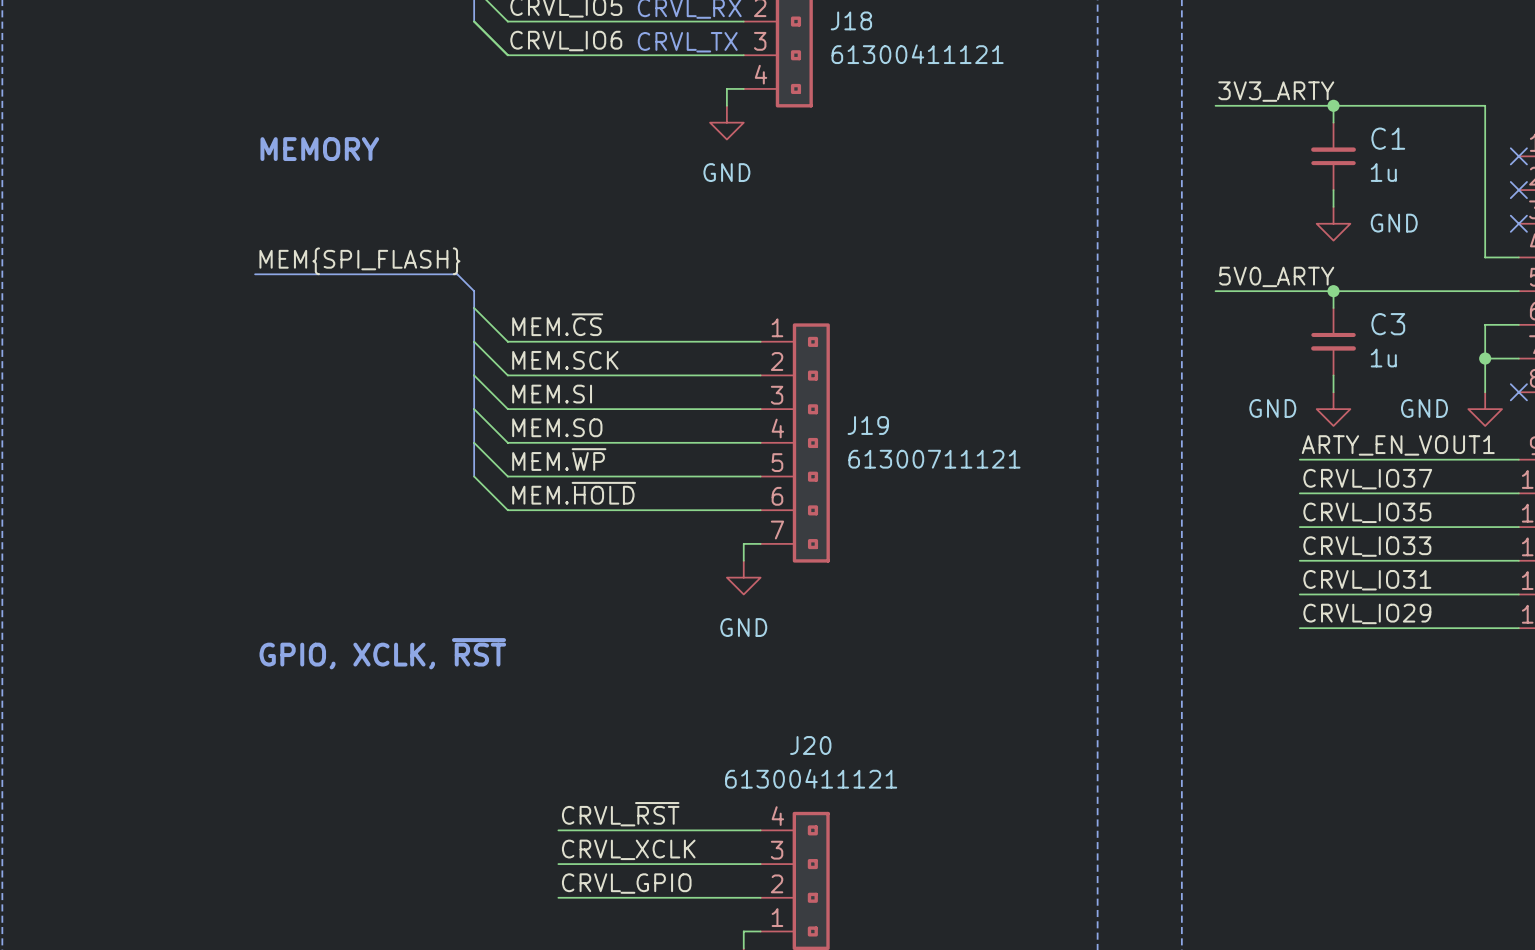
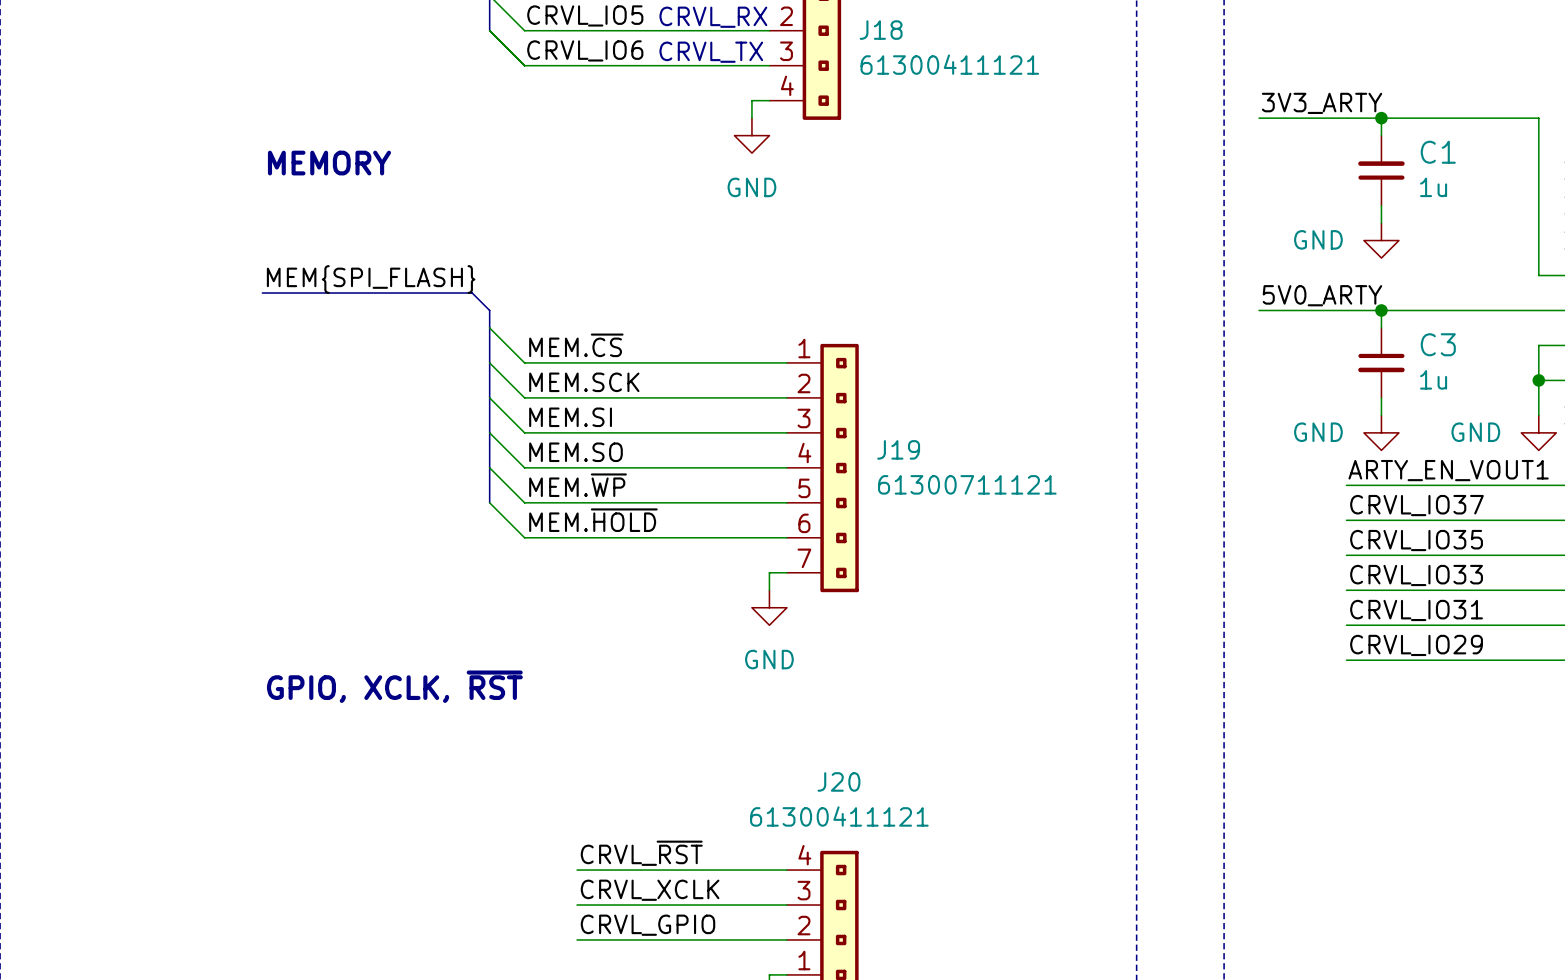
power symbol text position: GND (1394, 223) -> GND (1318, 239)

